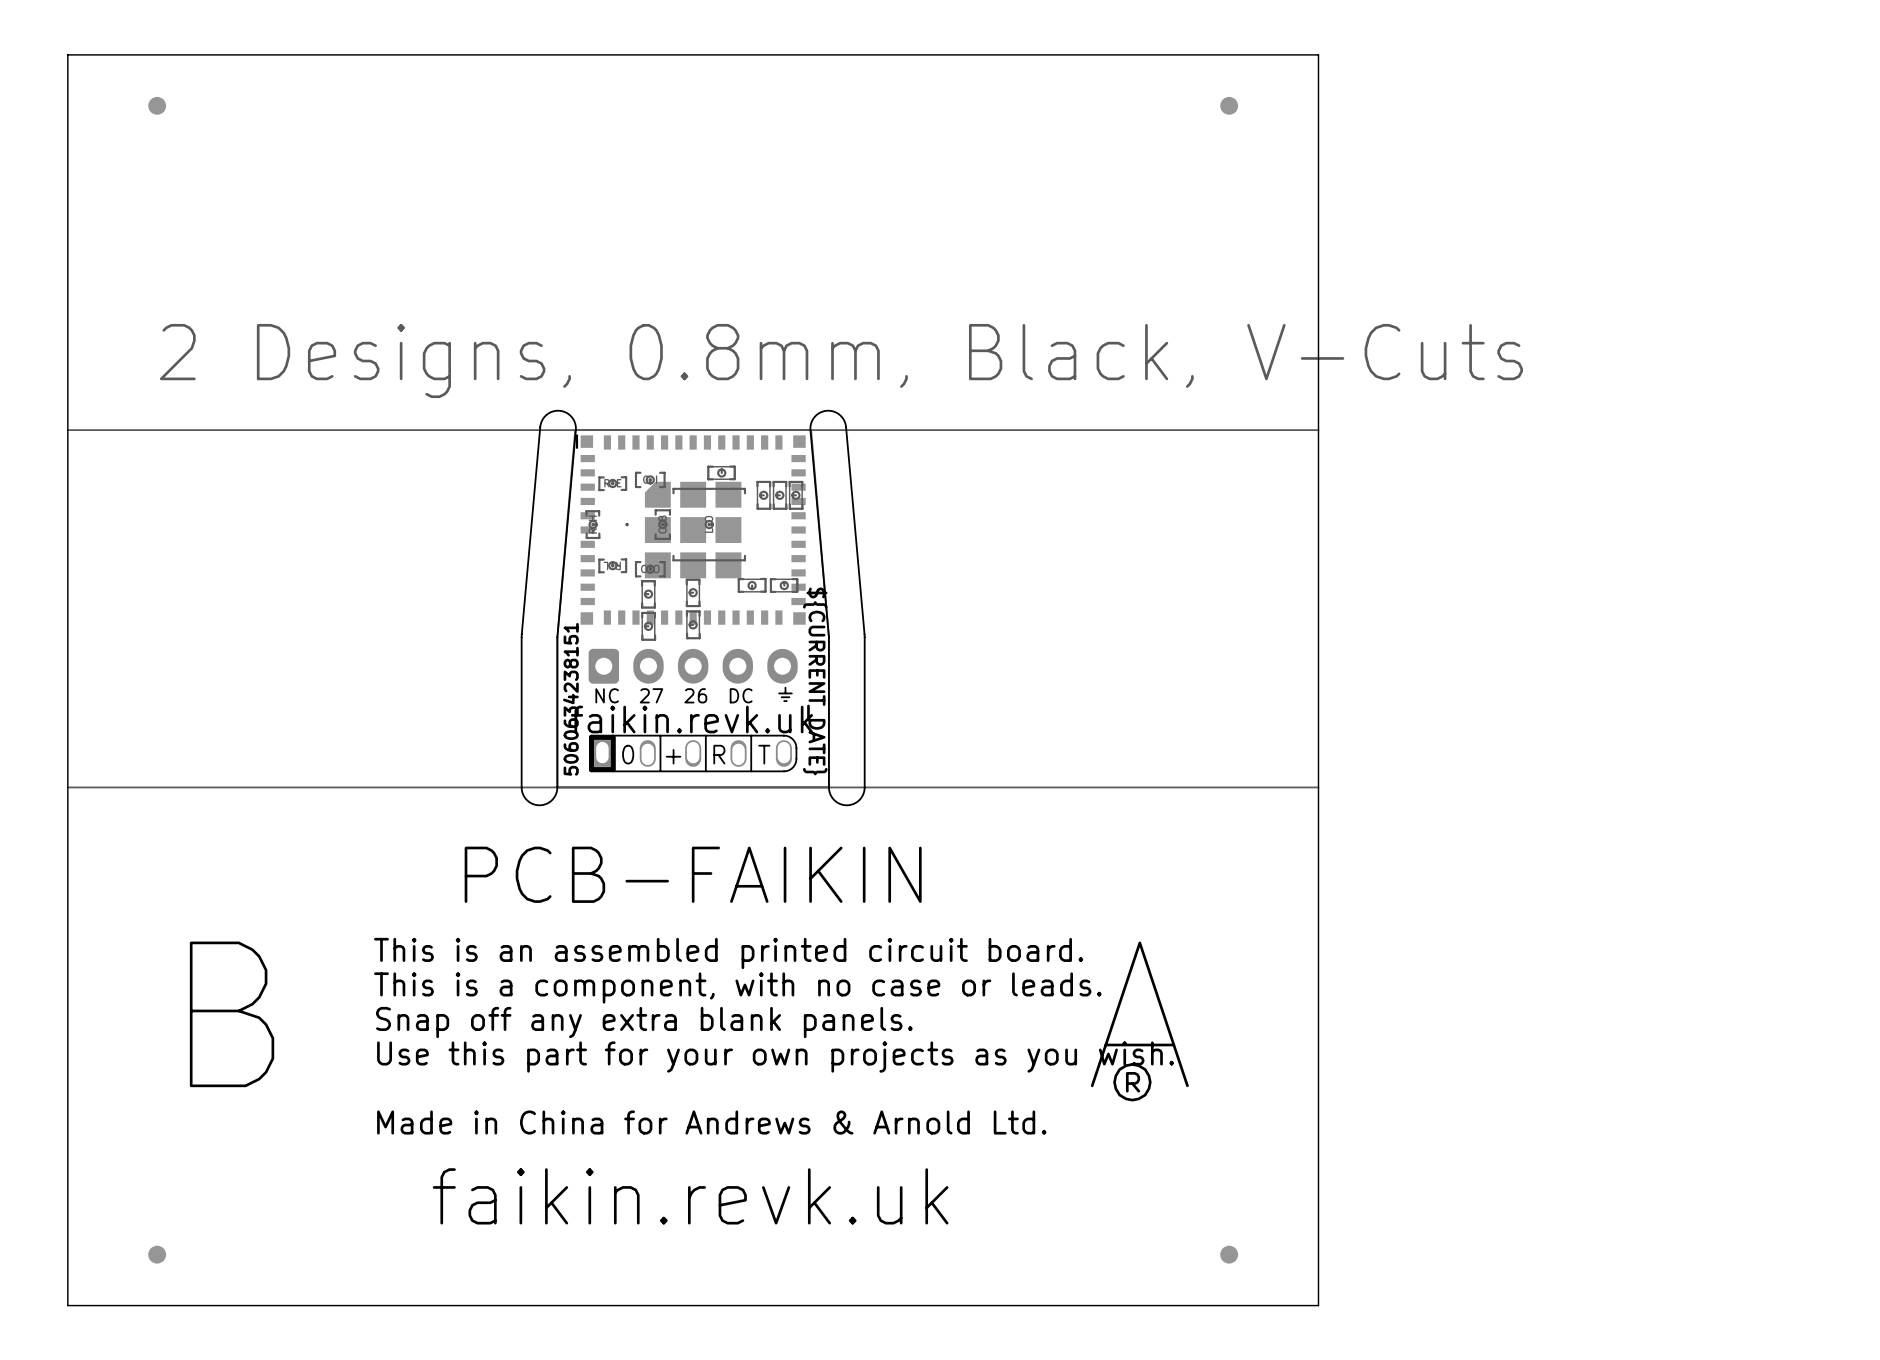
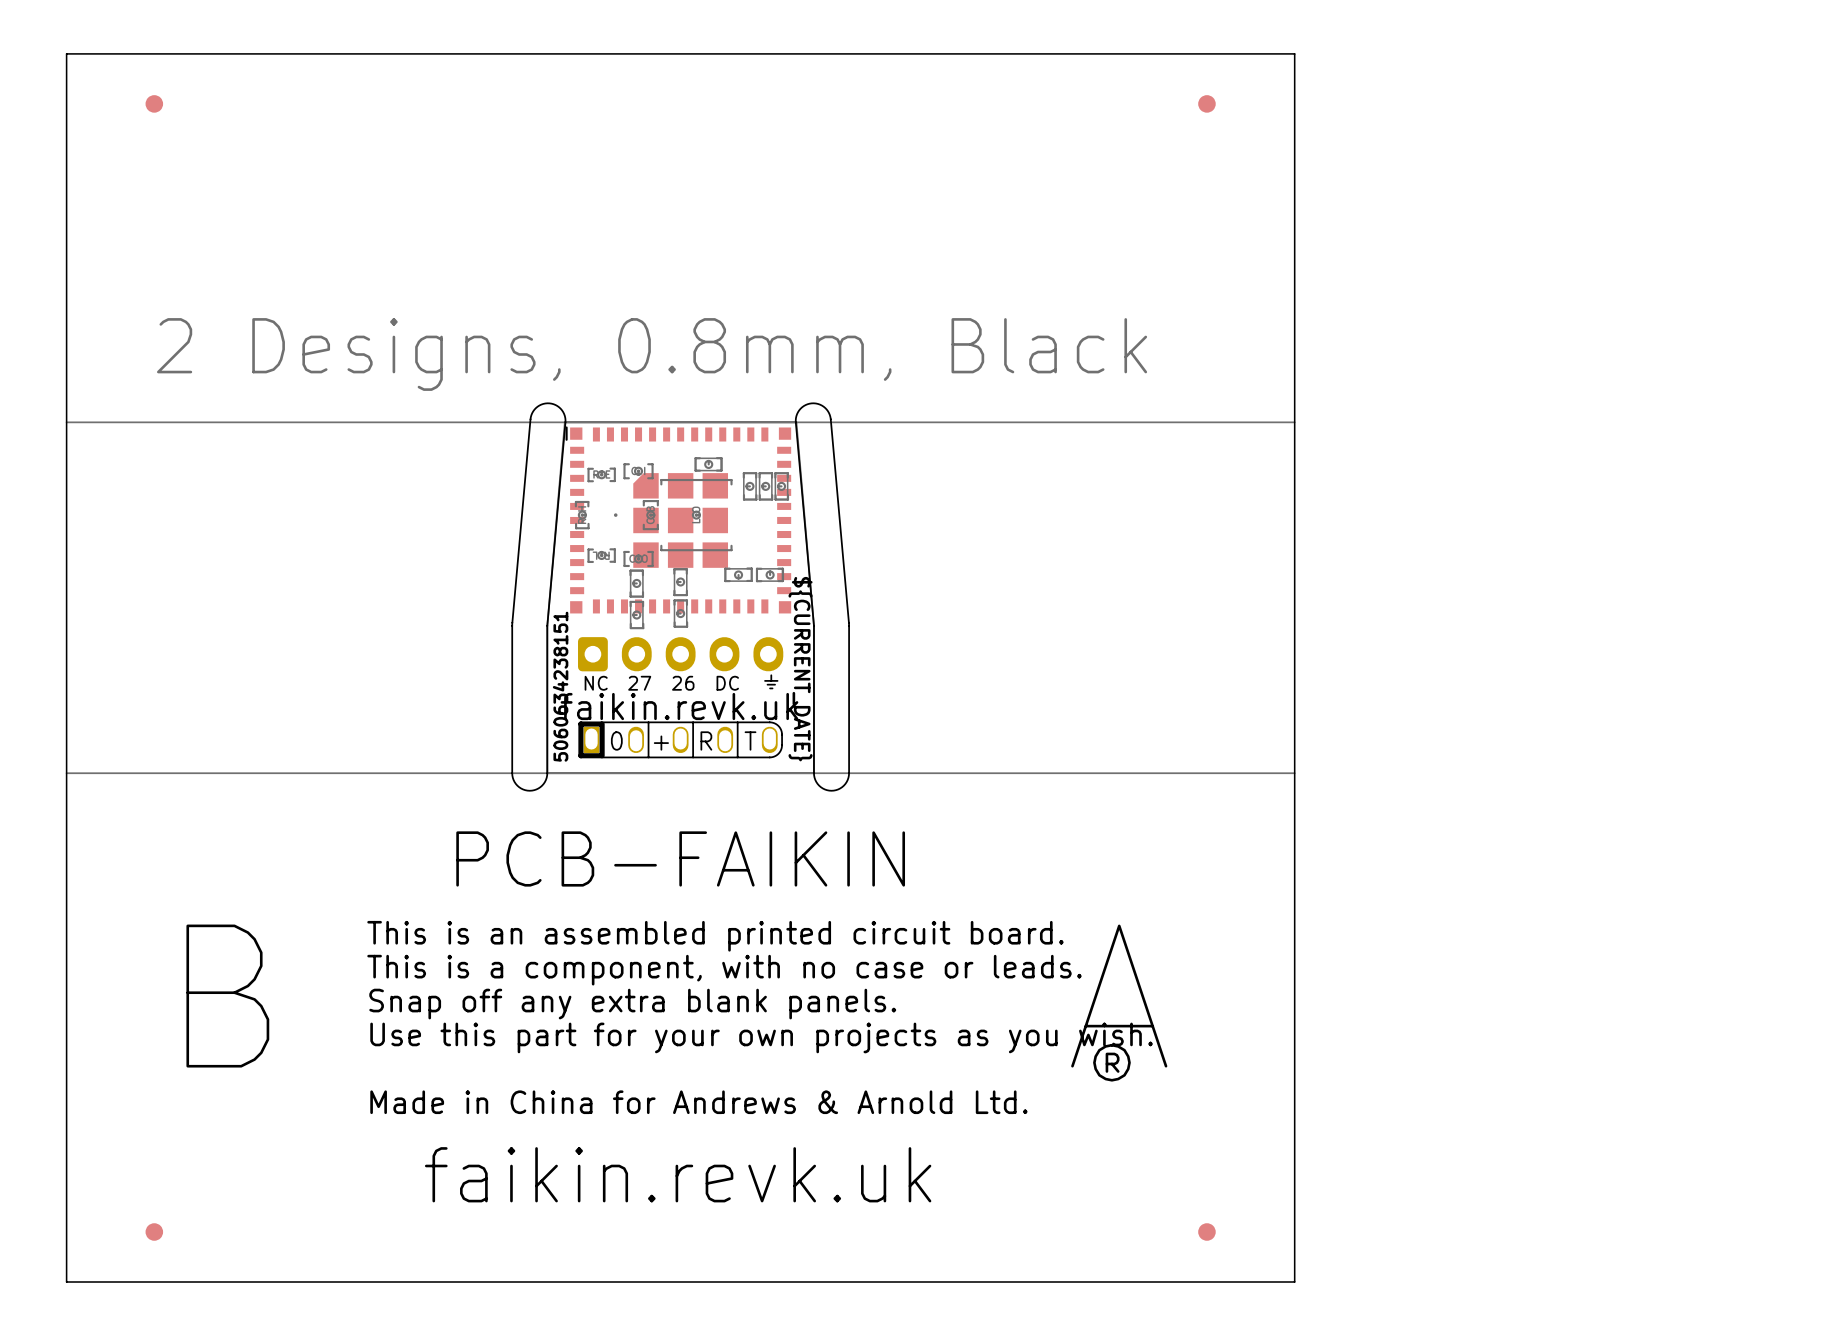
text: 2 Designs, 0.8mm, Black, V-Cuts (841, 361) -> 2 Designs, 0.8mm, Black (652, 354)

